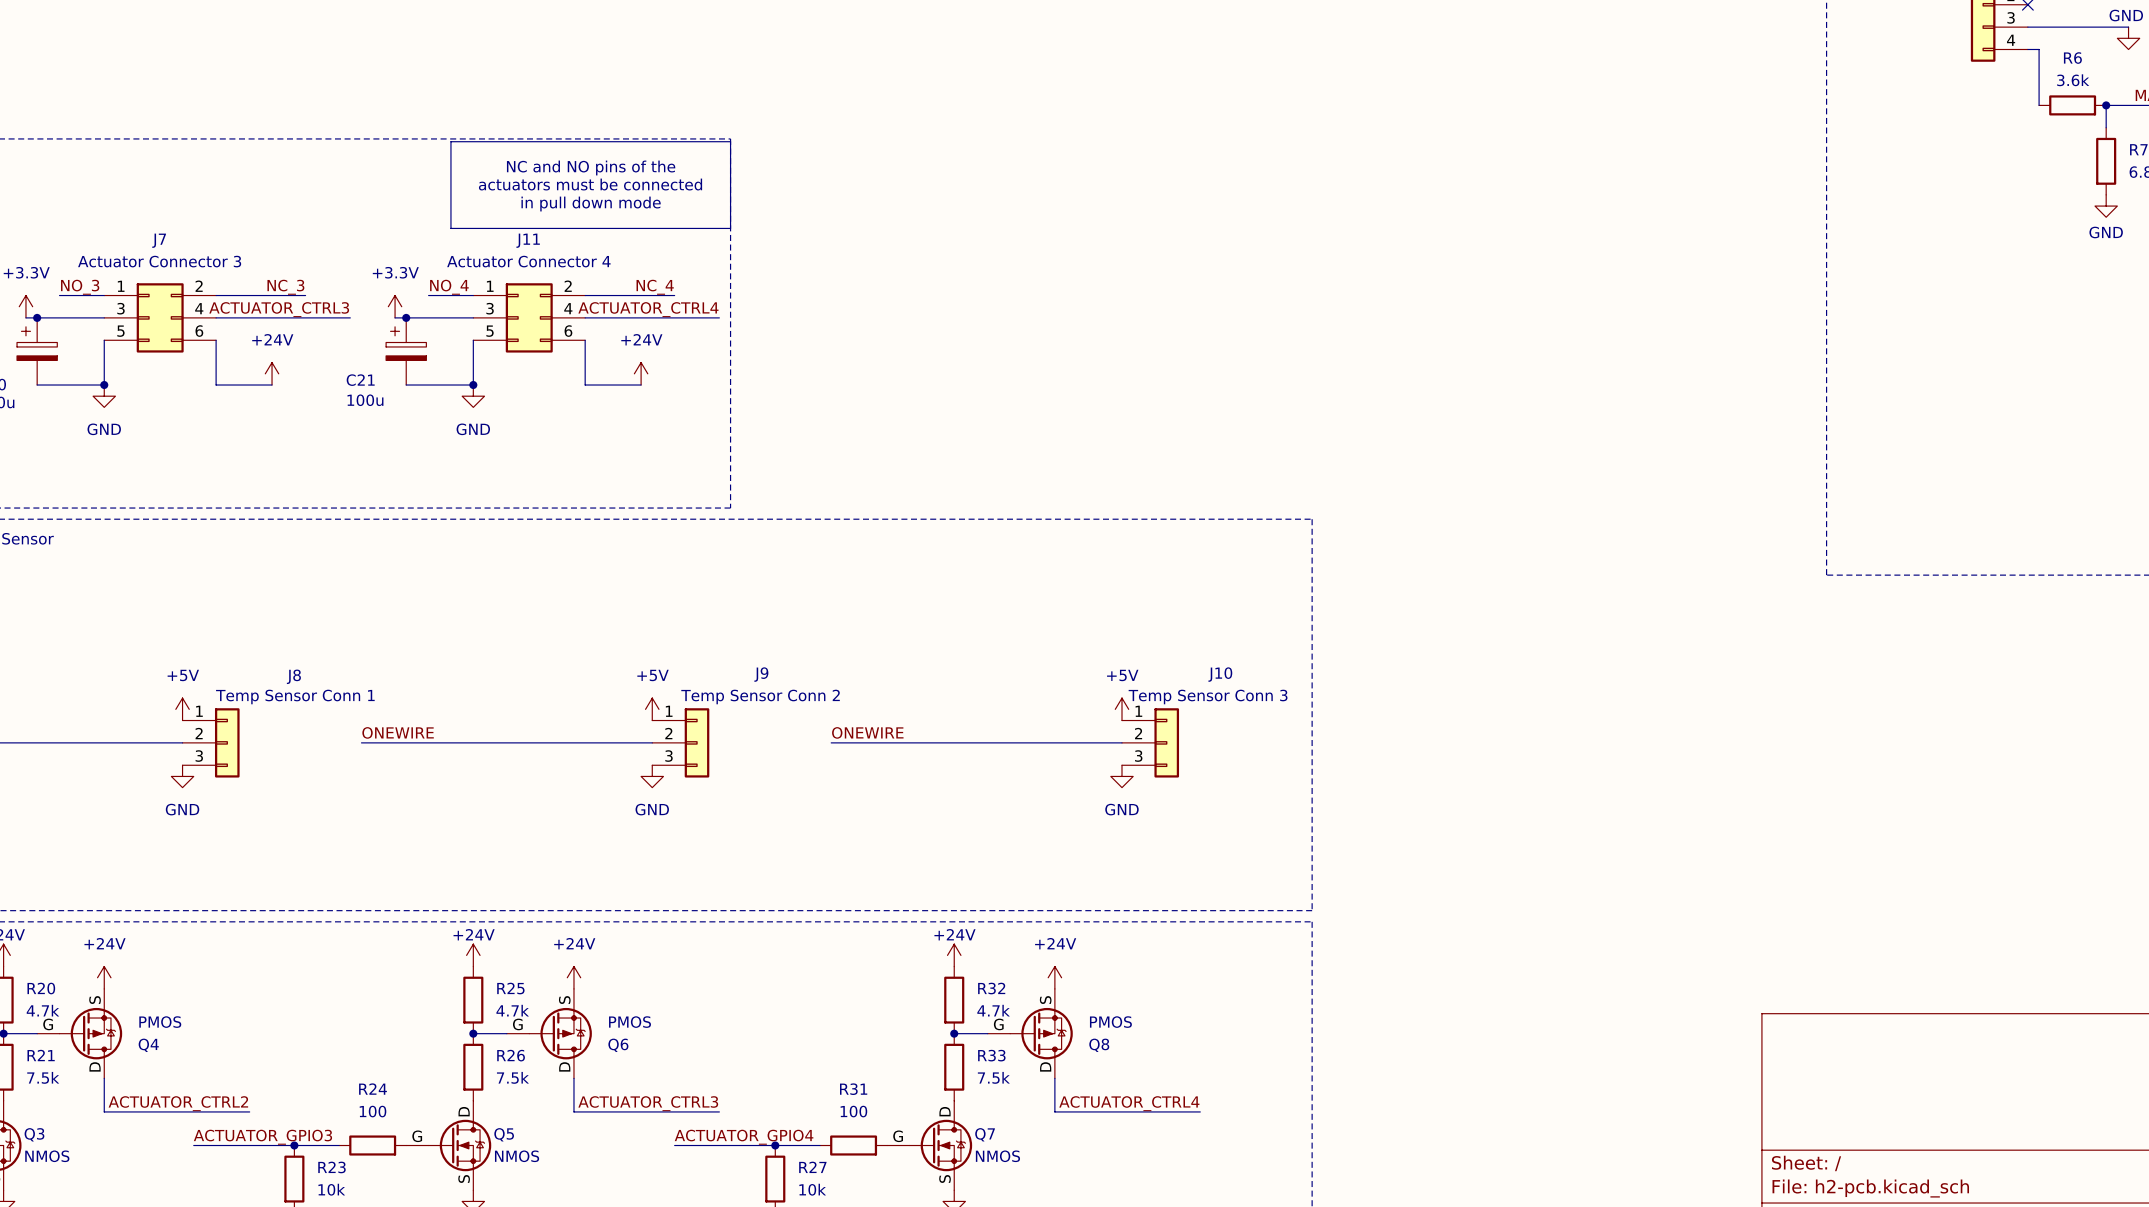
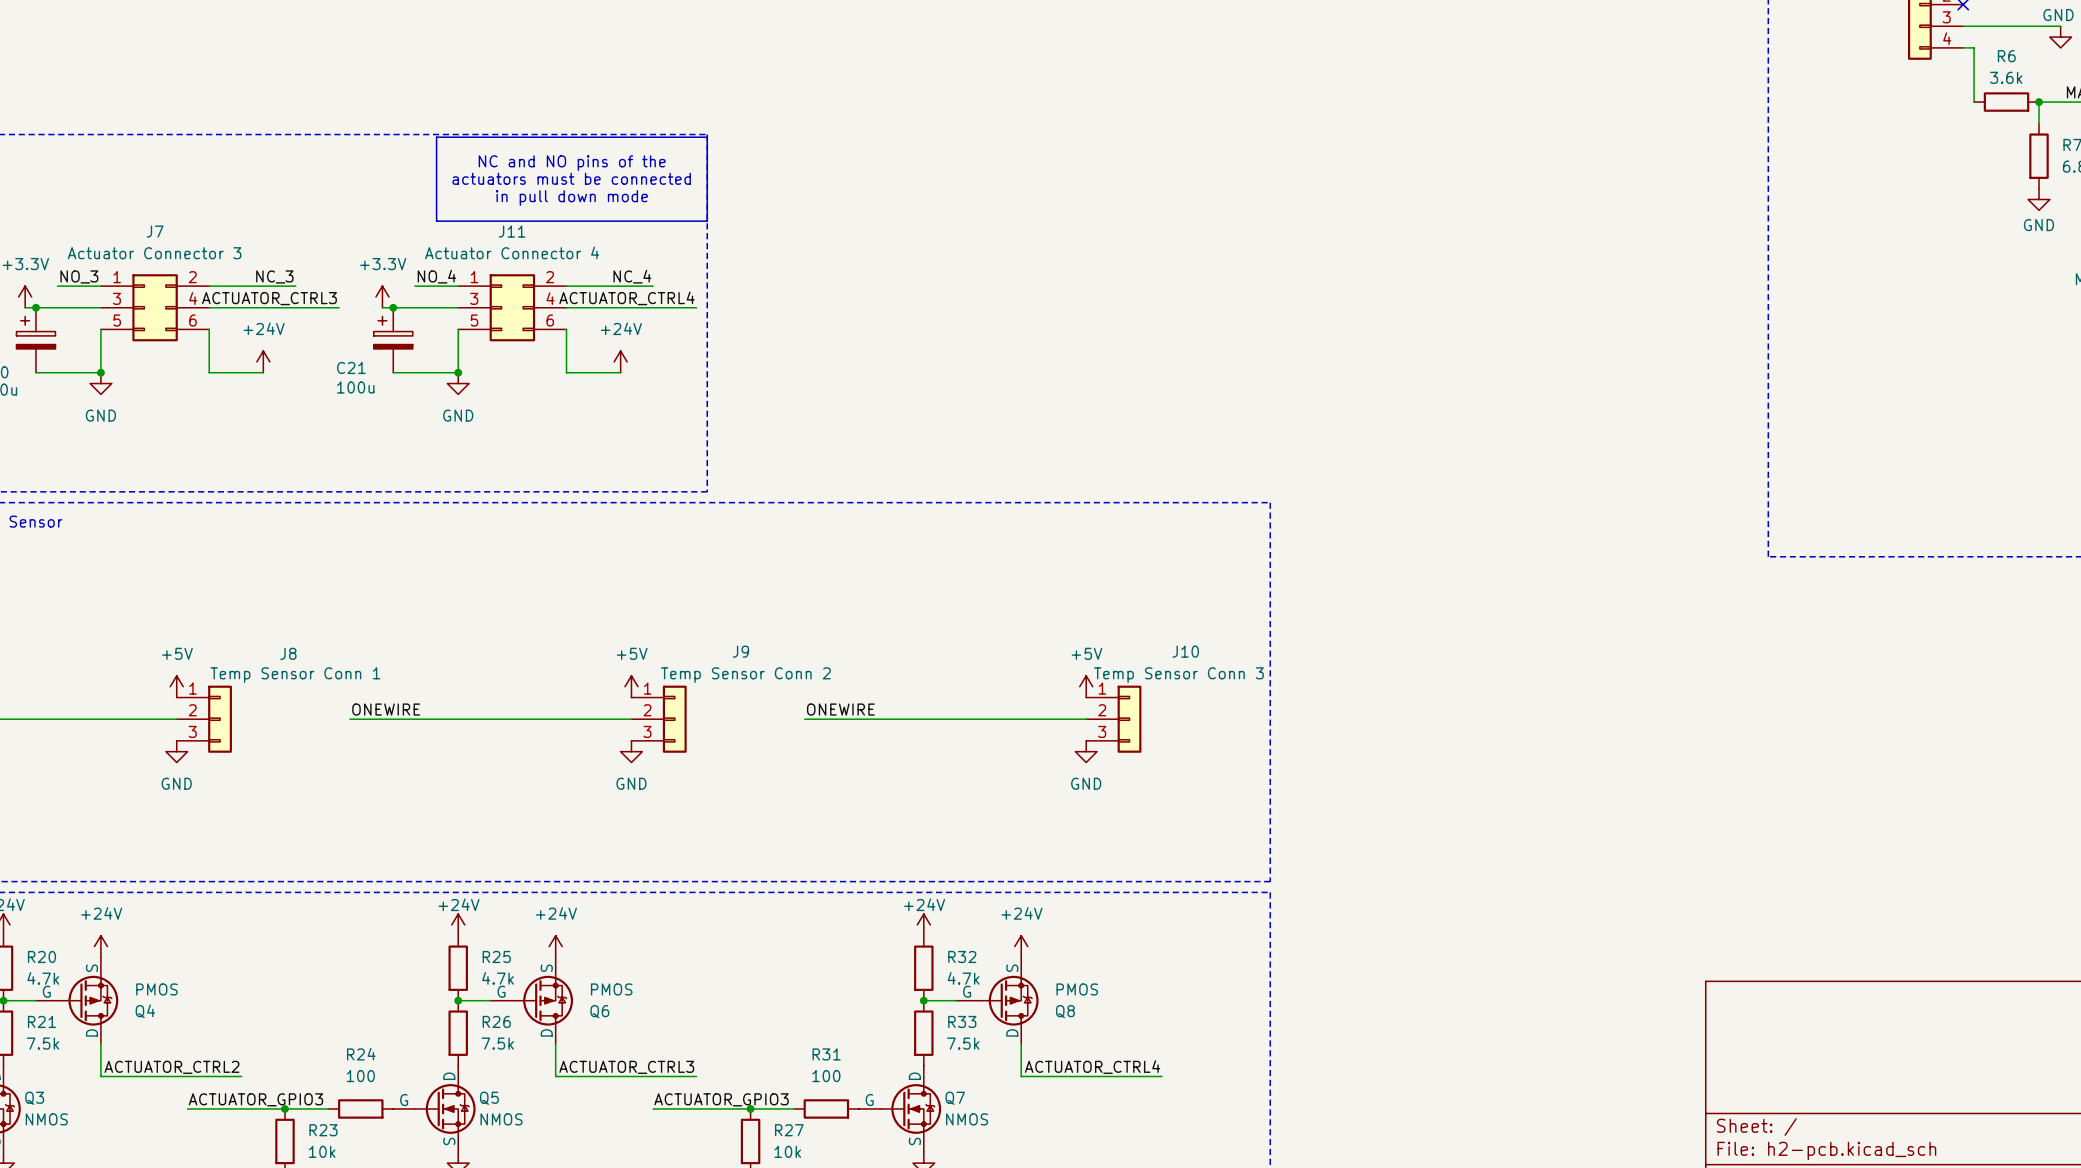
label: ACTUATOR_GPIO4 (744, 1137) -> ACTUATOR_GPIO3 (721, 1099)

